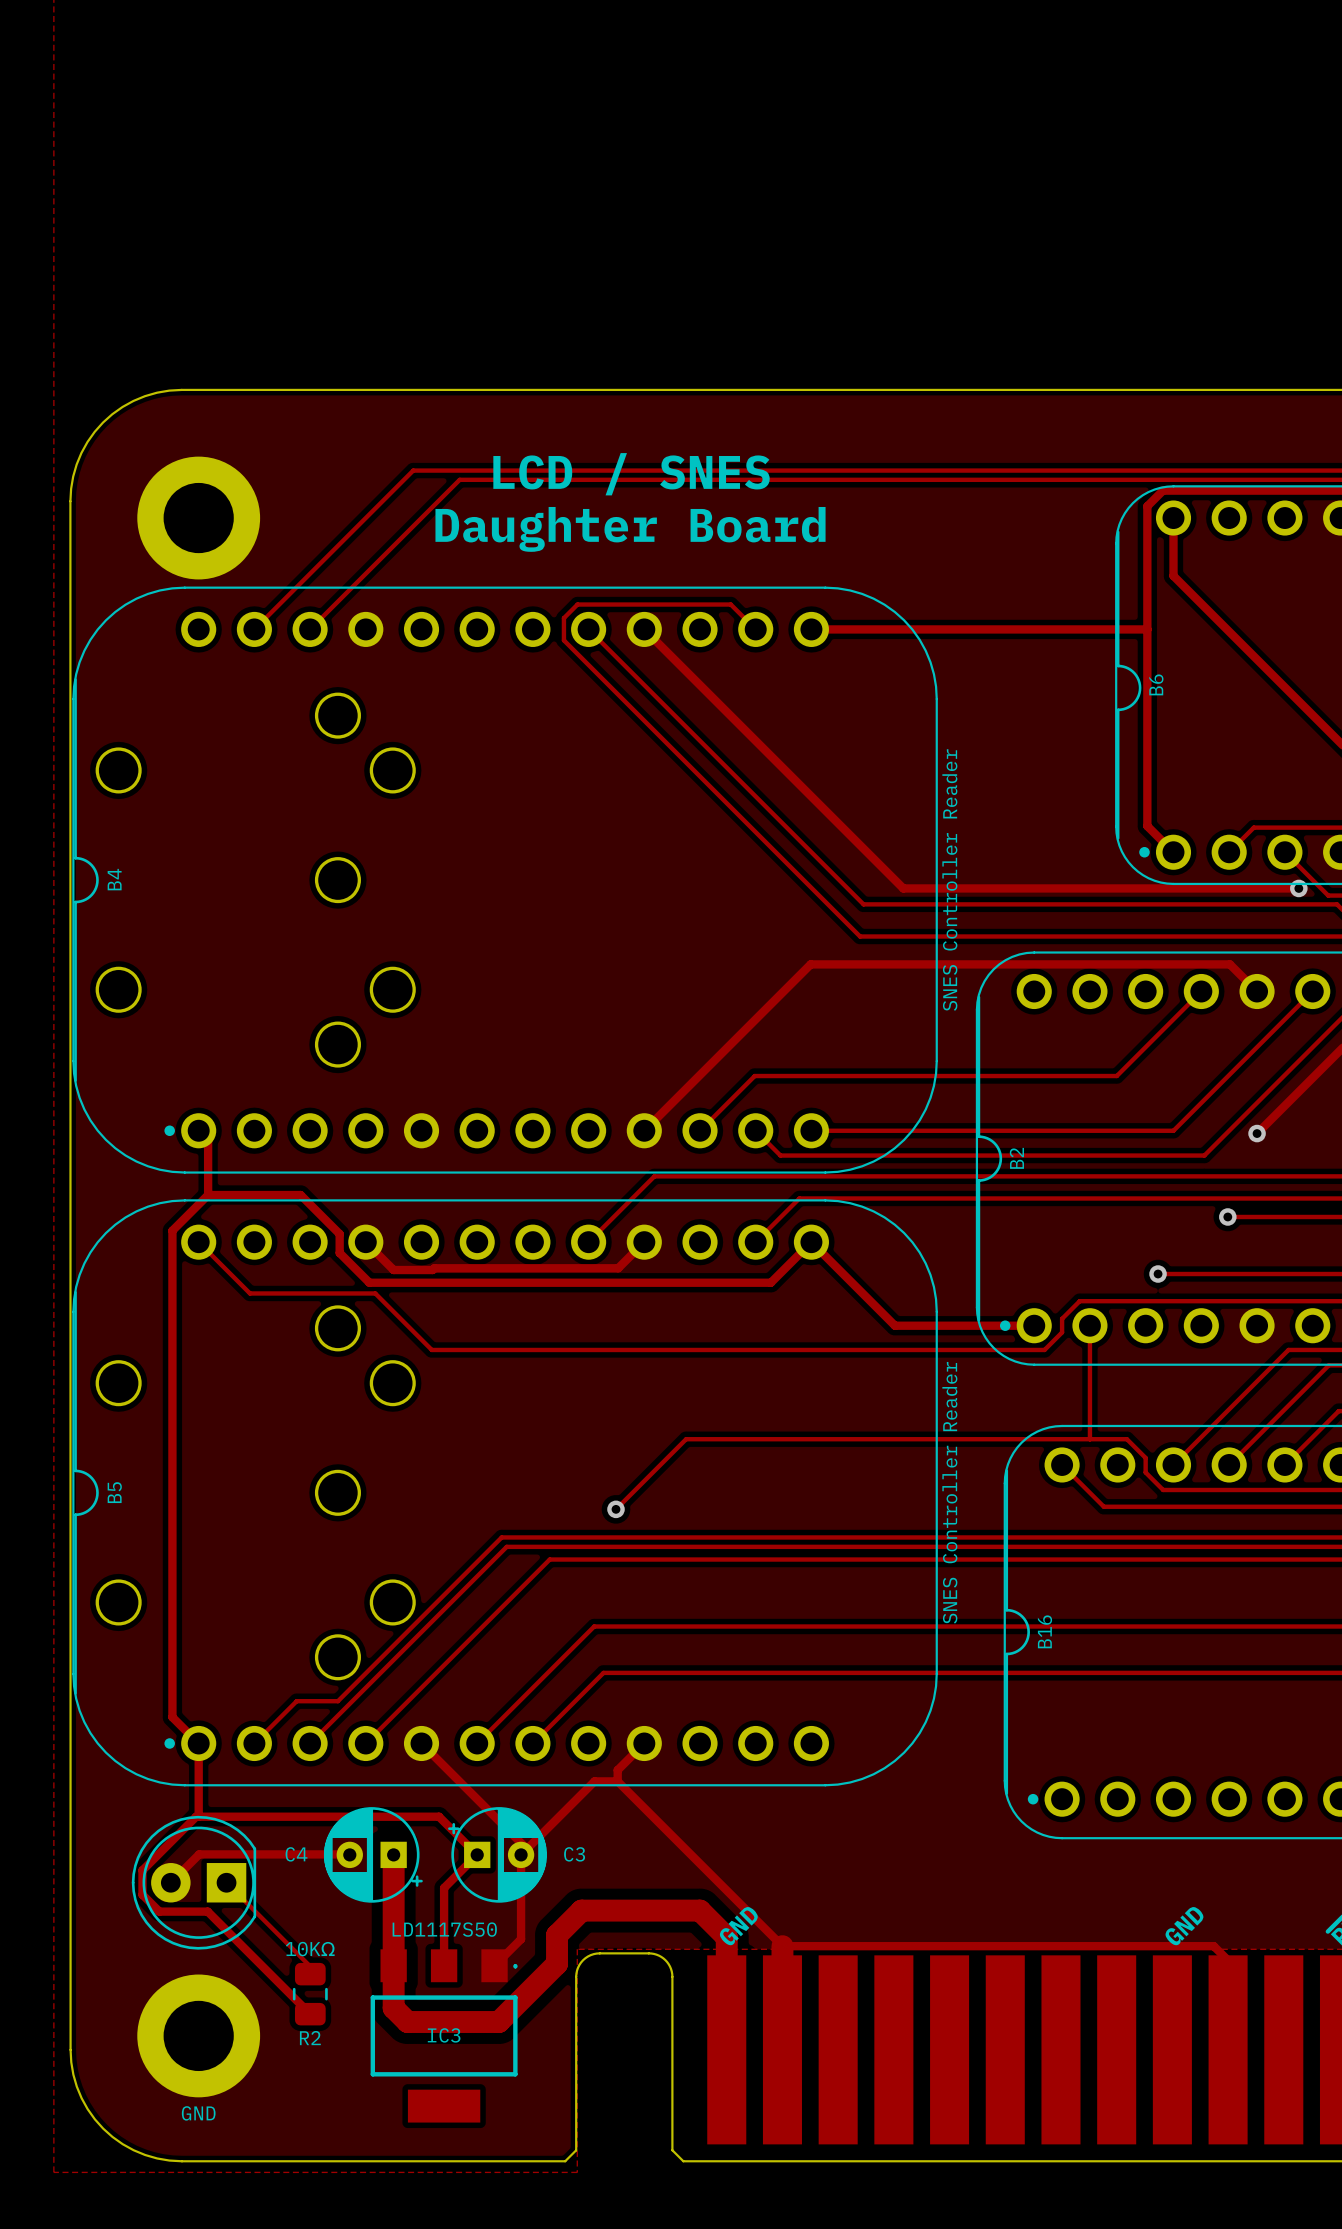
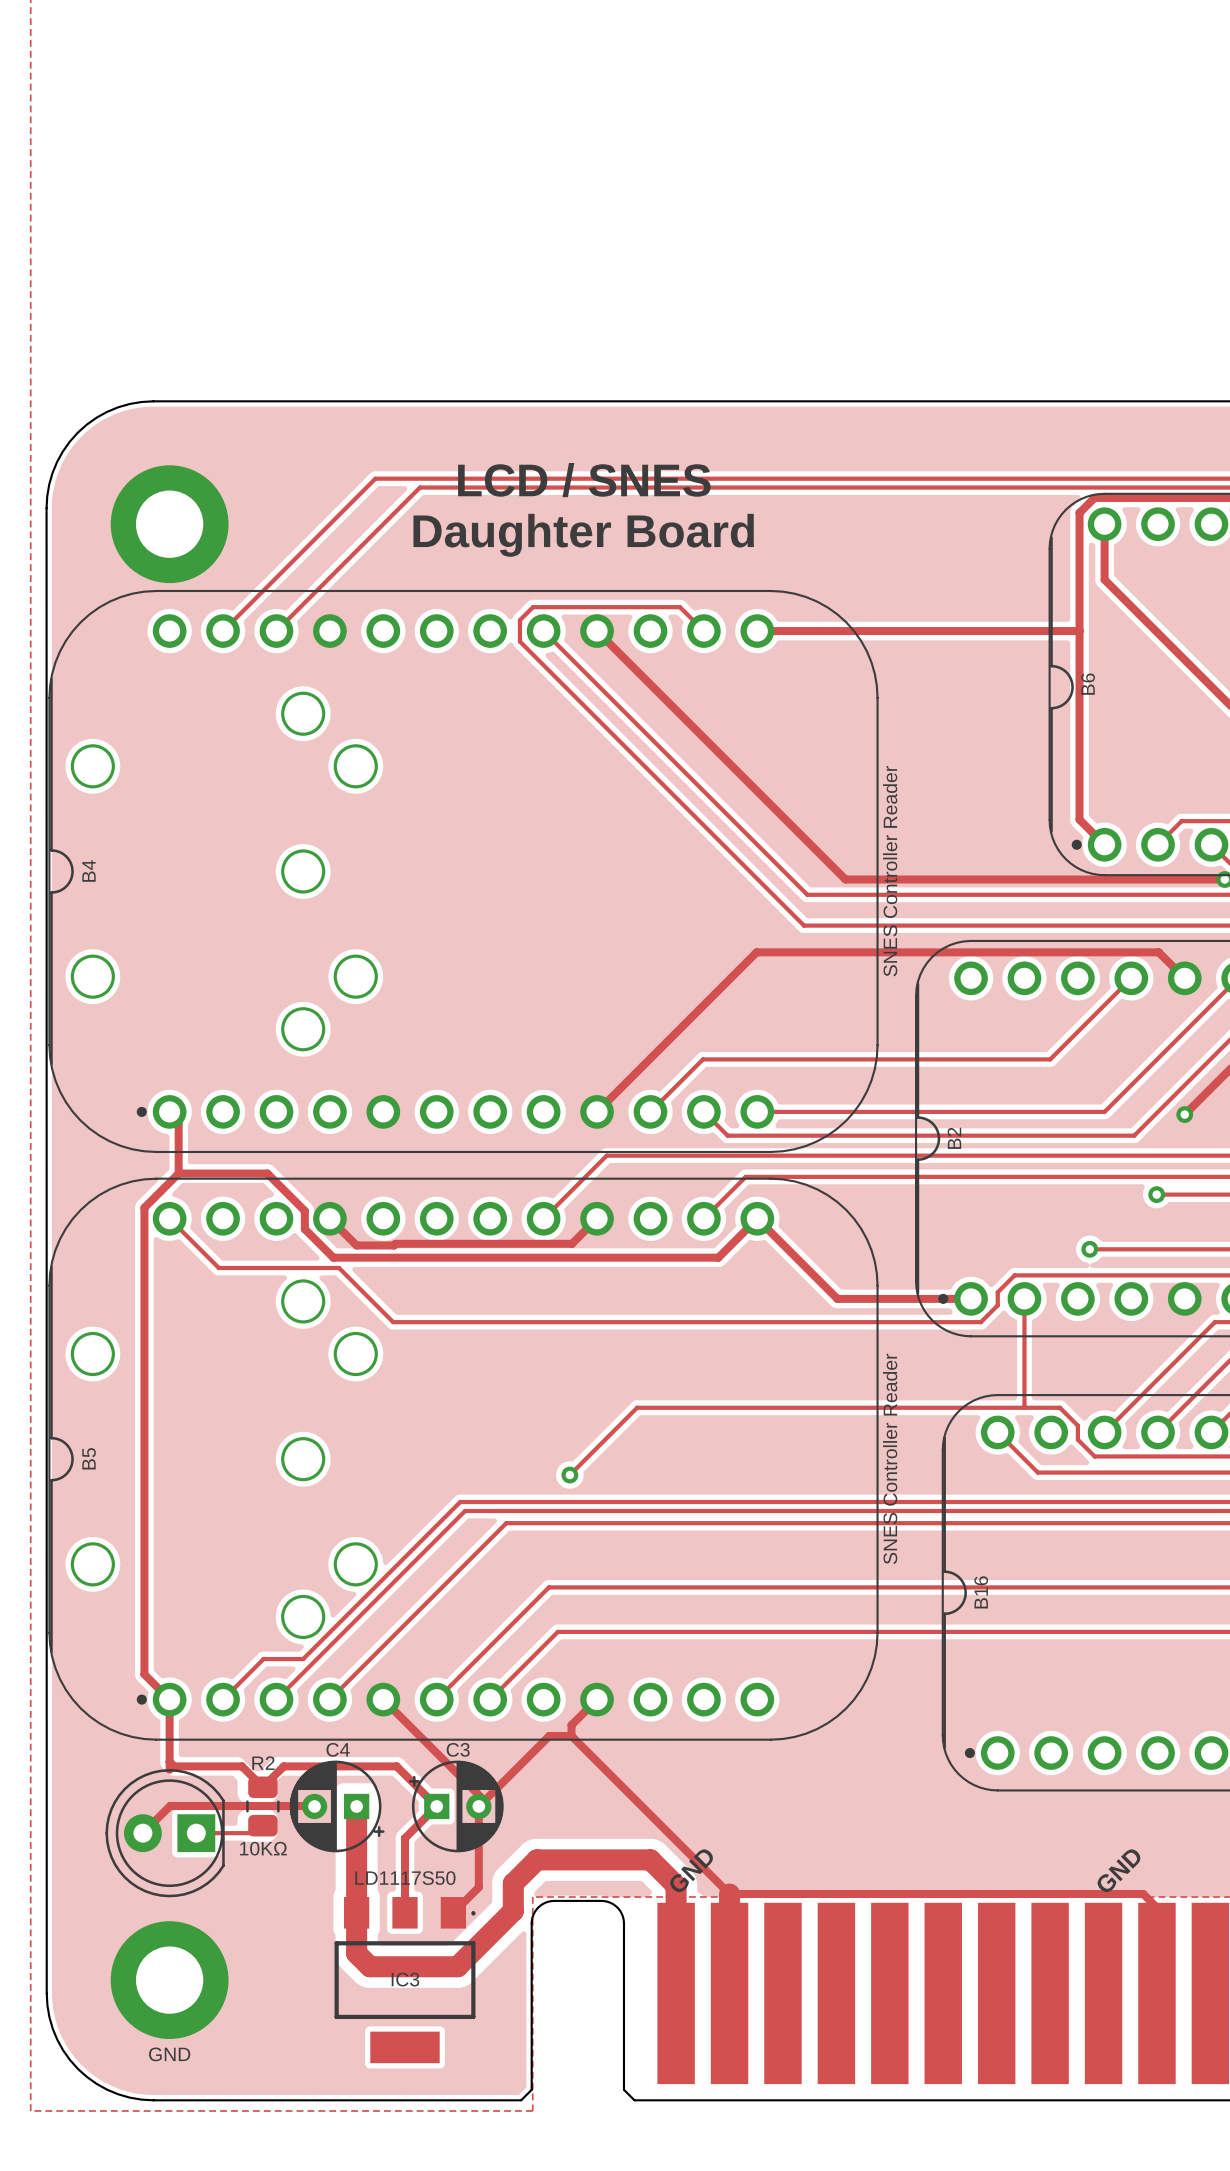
track: (439, 1816) (196, 1816) (142, 1870) (142, 1894) (159, 1911) (207, 1911) (310, 2014) -> (400, 1769) (396, 1766) (283, 1766) (262, 1787) (242, 1766) (174, 1766) (169, 1761)
C4 name position: C4 (296, 1854) -> C4 (338, 1749)
C3 name position: C3 (574, 1854) -> C3 (458, 1749)
track: (226, 1882) (310, 1966) -> (196, 1833) (255, 1833) (262, 1825)
R2 value position: 10KΩ (310, 1949) -> 10KΩ (263, 1848)
R2 position: (310, 1994) -> (262, 1806)
R2 name position: R2 (310, 2038) -> R2 (263, 1763)

